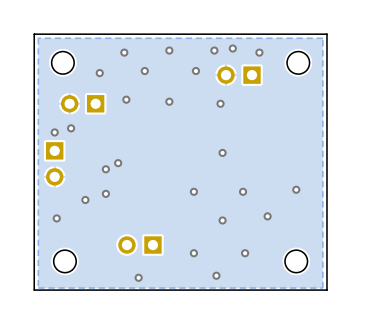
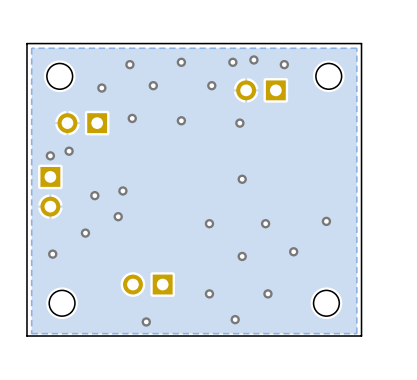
via: none -> (94, 195)
via: (105, 169) -> none
via: none -> (118, 216)
via: (105, 193) -> none

